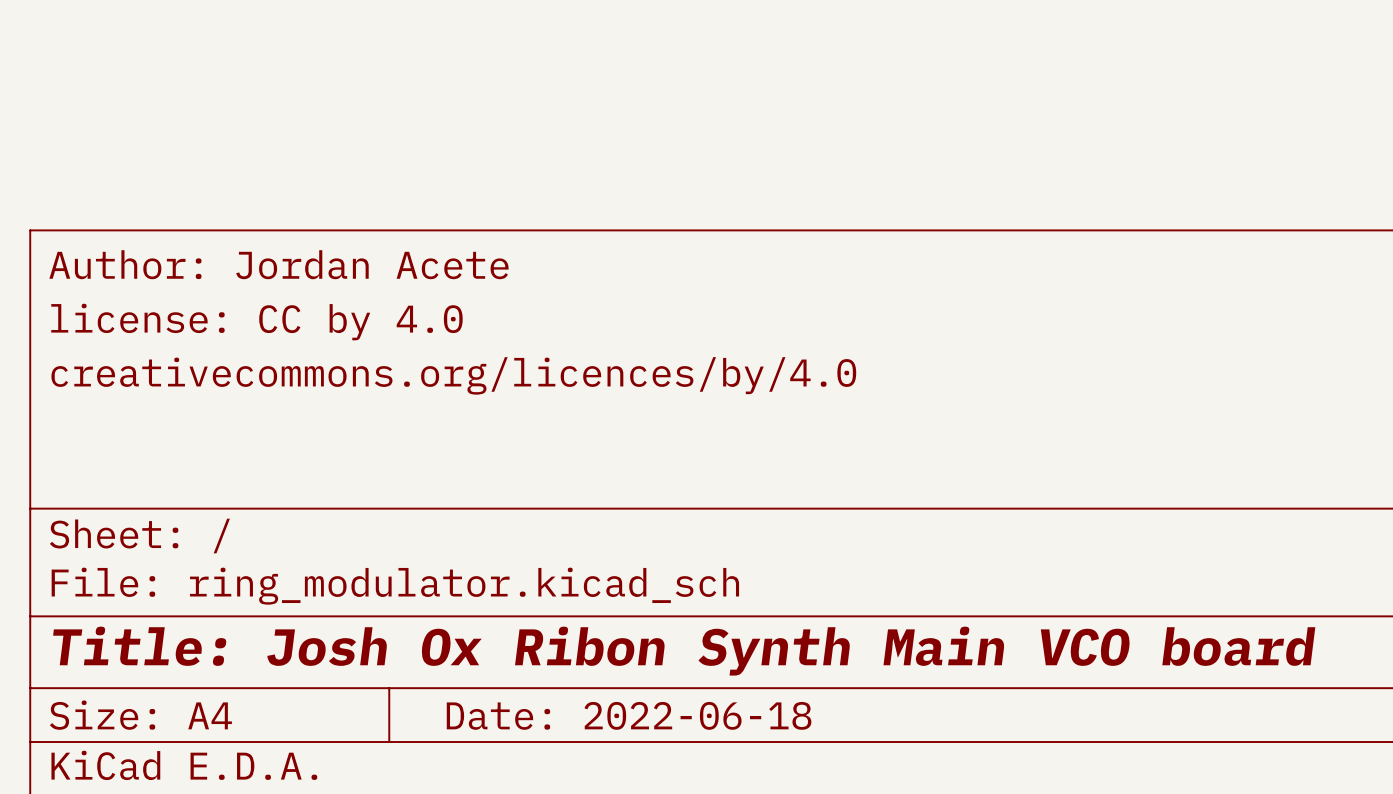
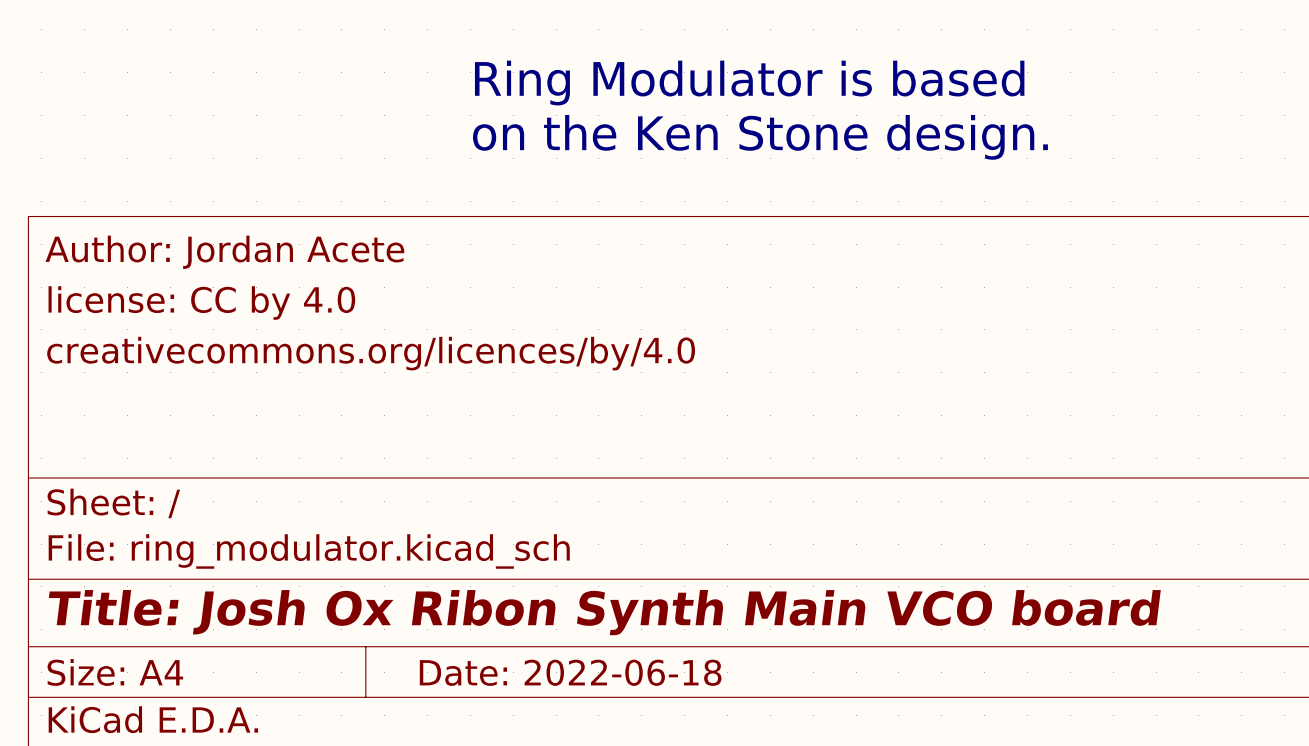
text: none -> Ring Modulator is based (749, 83)
text: none -> on the Ken Stone design. (760, 137)

